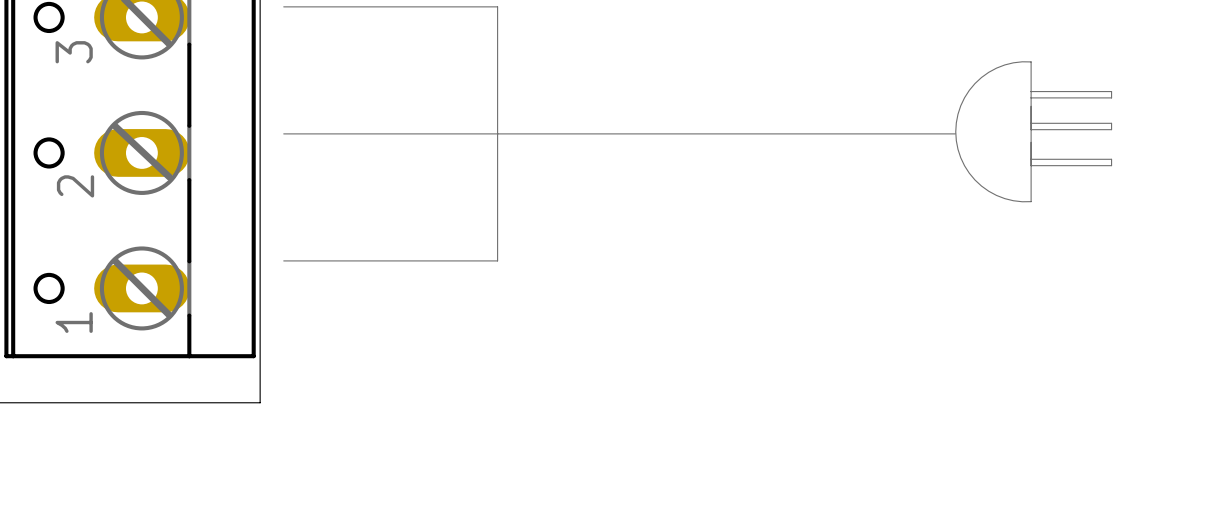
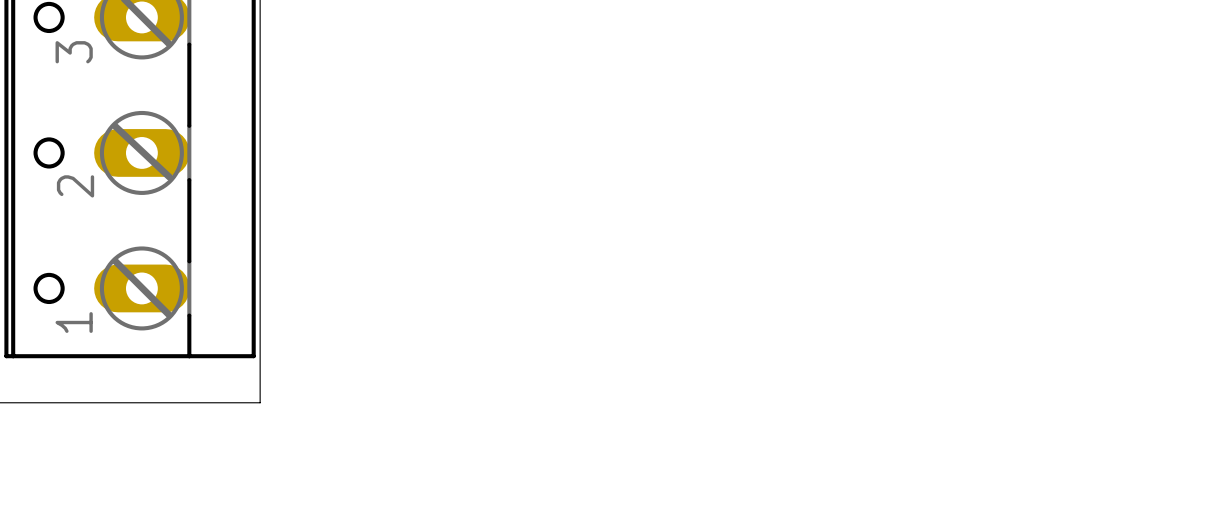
line: (283, 6) (497, 6) (497, 260) (283, 260) -> none
line: (1031, 61) (1031, 201) (1022, 201) (996, 195) (975, 180) (960, 157) (955, 131) (960, 105) (975, 83) (988, 72) (1004, 64) (1031, 61) -> none
line: (1031, 91) (1111, 91) (1111, 97) (1031, 97) -> none
line: (1031, 123) (1111, 123) (1111, 129) (1031, 129) -> none
line: (283, 133) (954, 133) -> none
line: (1031, 159) (1111, 159) (1111, 165) (1031, 165) -> none

